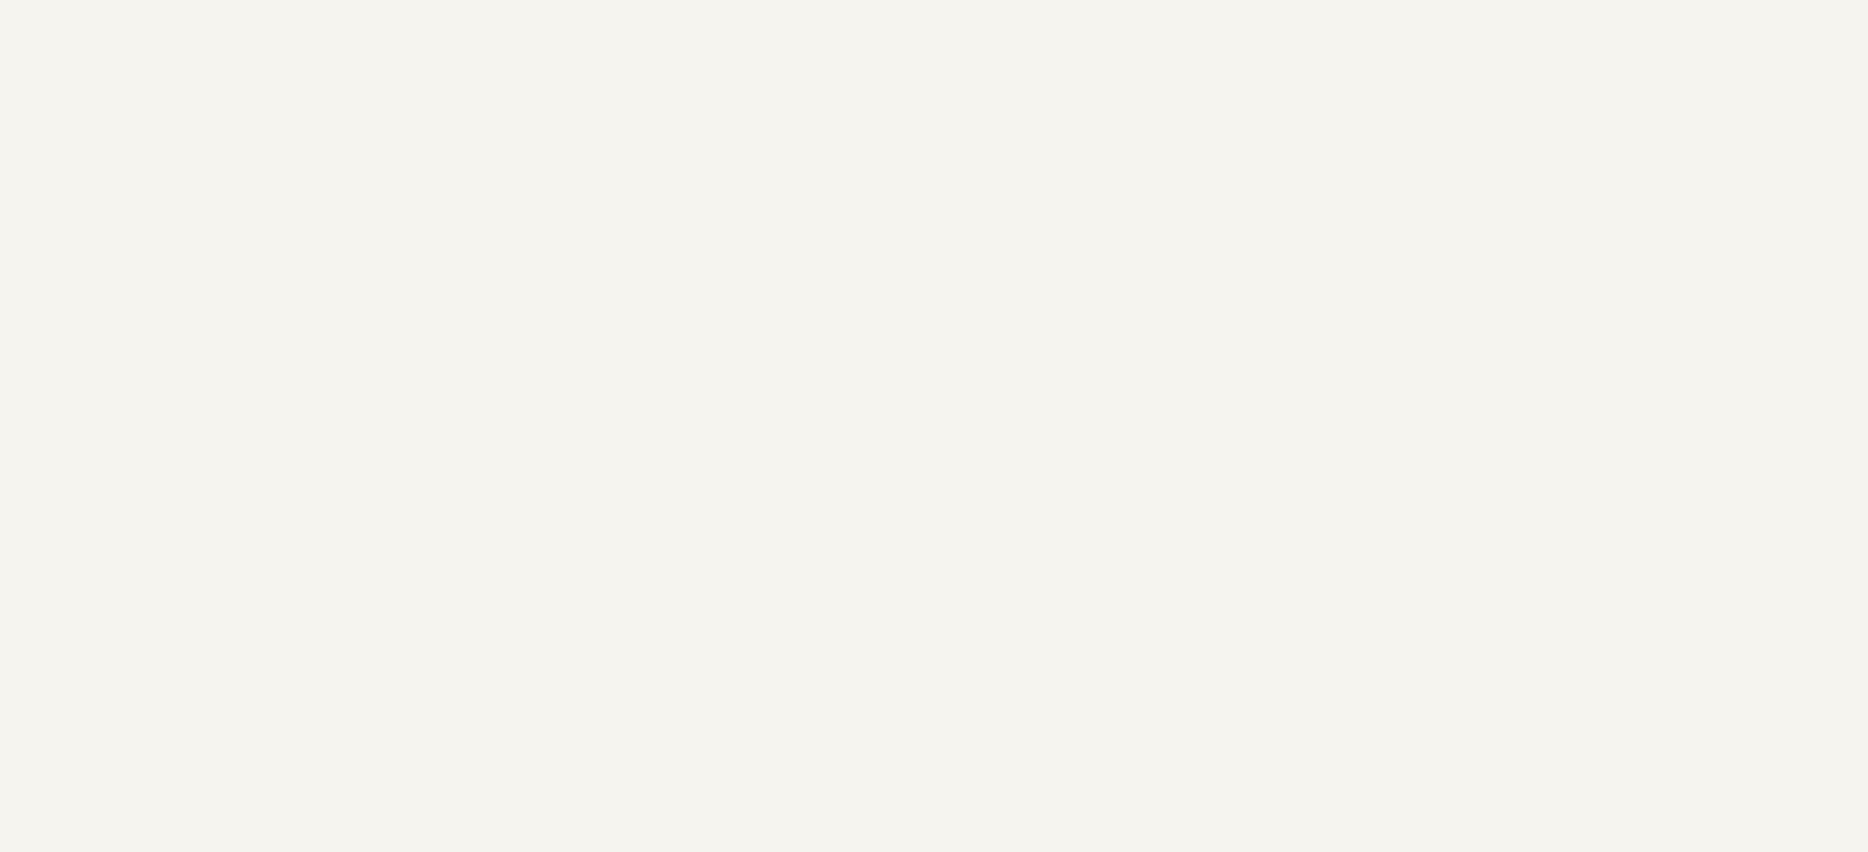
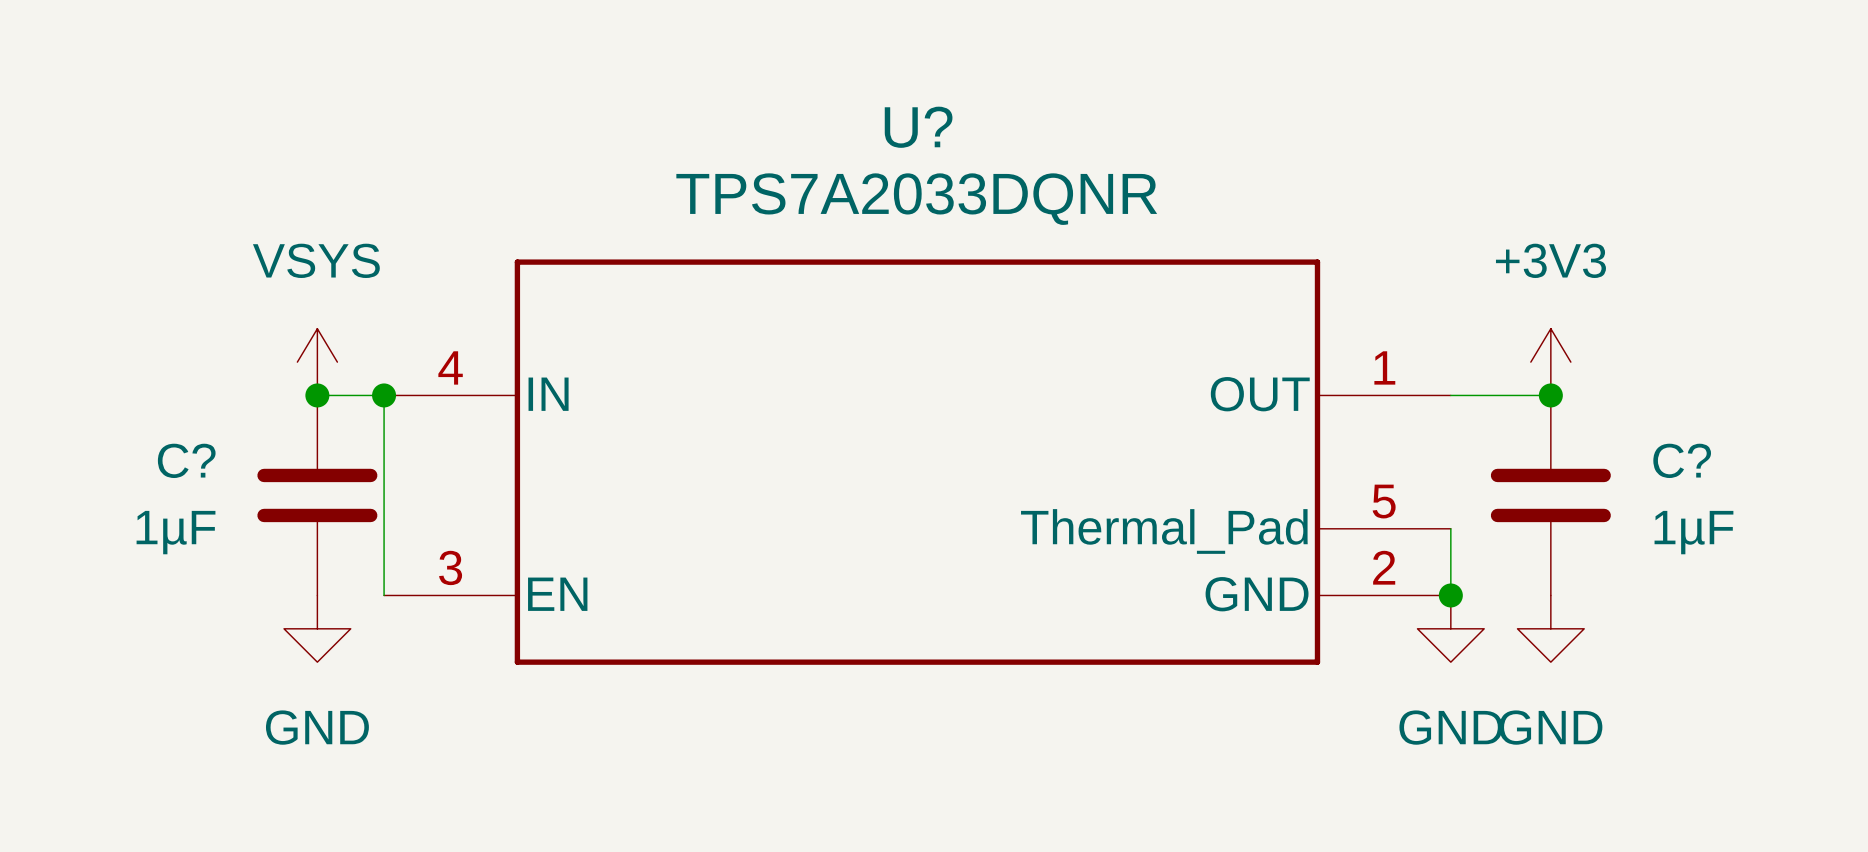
power symbol: none -> VSYS (317, 362)
power symbol: none -> +3V3 (1550, 362)
wire: none -> (317, 395) (384, 395) (384, 595)
junction: none -> (317, 395)
junction: none -> (384, 395)
wire: none -> (1450, 395) (1550, 395)
junction: none -> (1550, 395)
U?: none -> TPS7A2033DQNR (917, 462)
C?: none -> 1µF (317, 495)
C?: none -> 1µF (1550, 495)
wire: none -> (1450, 528) (1450, 595)
junction: none -> (1450, 595)
power symbol: none -> GND (317, 628)
power symbol: none -> GND (1450, 628)
power symbol: none -> GND (1550, 628)

